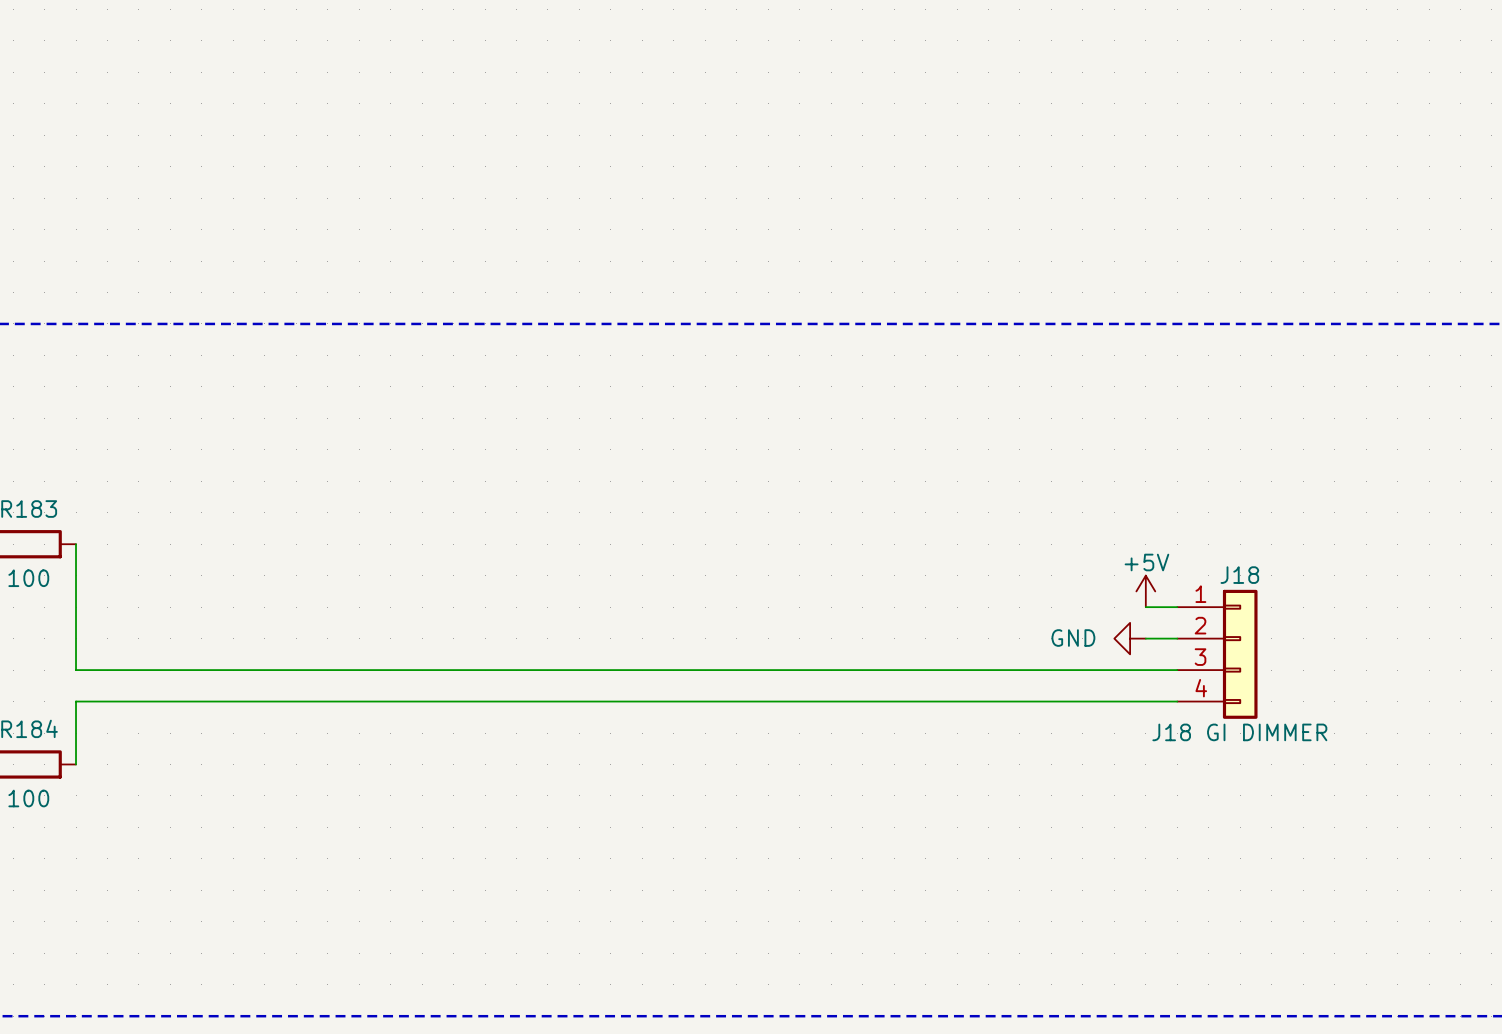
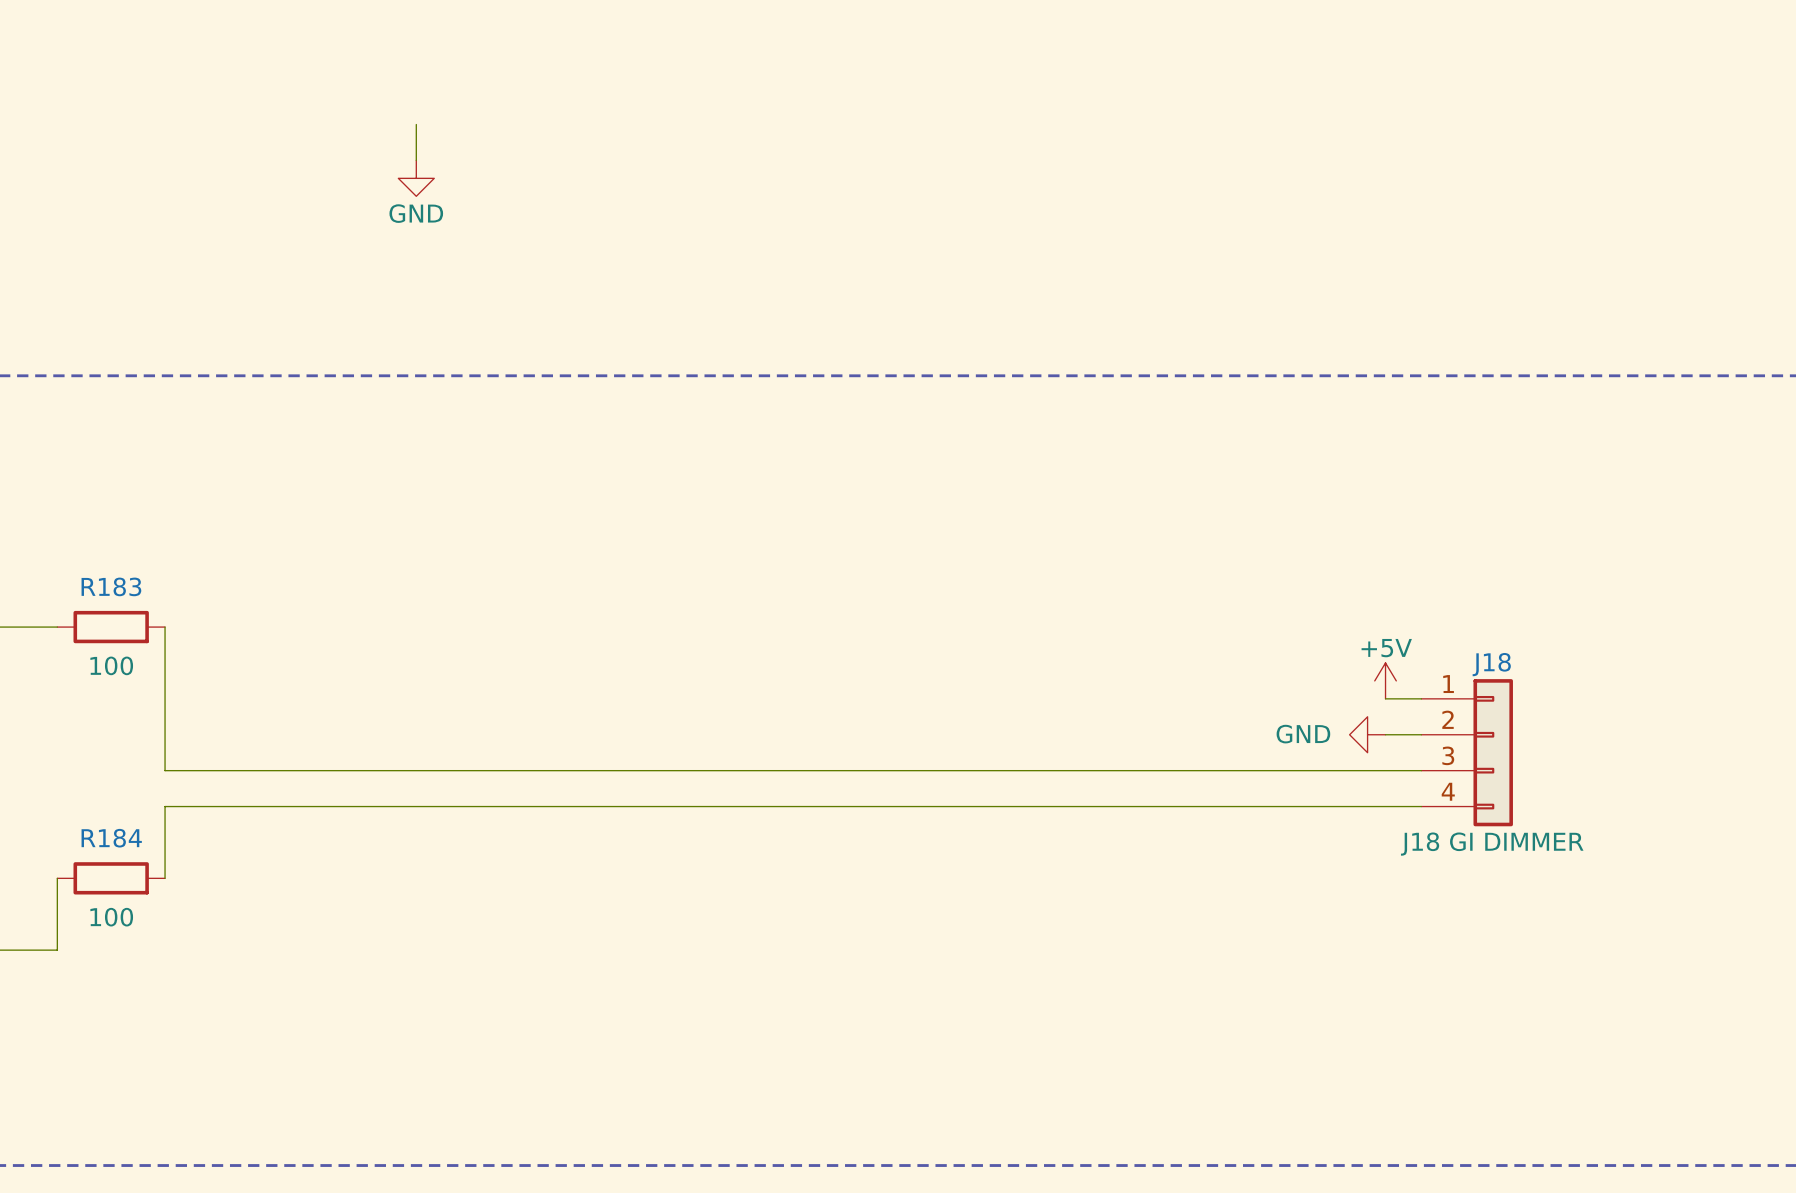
wire: none -> (416, 124) (416, 160)
power symbol: none -> GND (416, 178)

